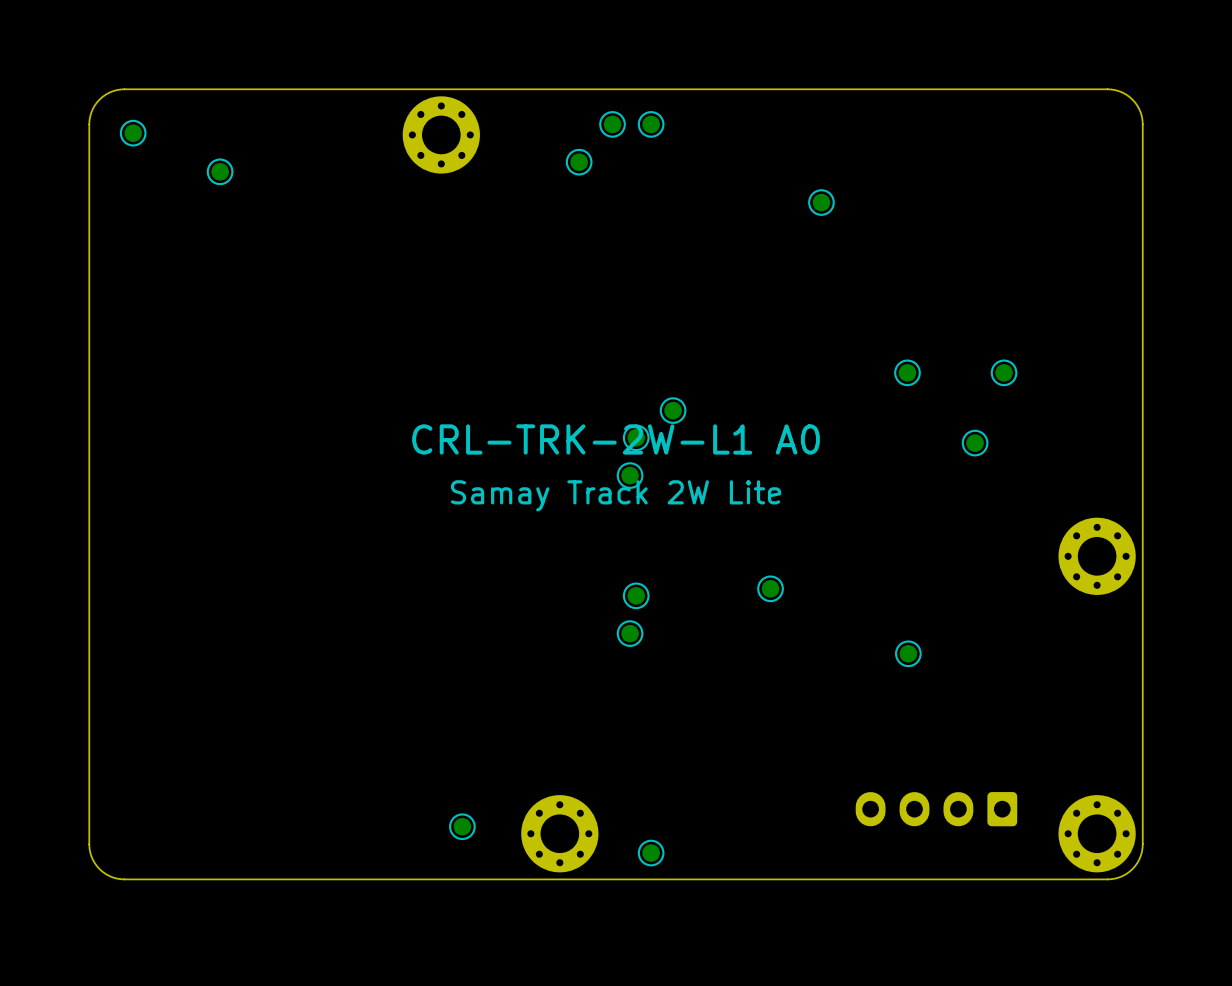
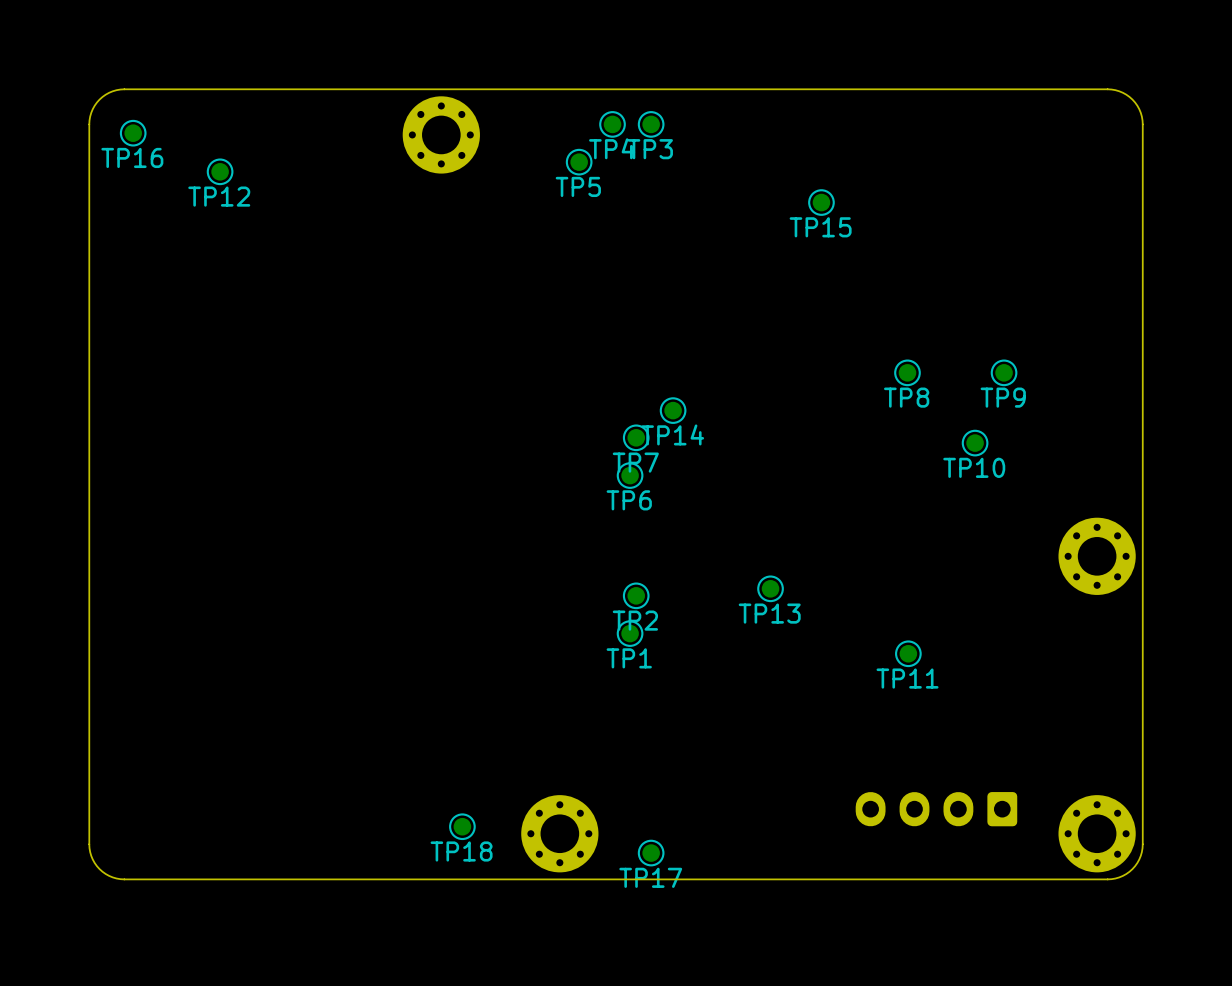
TP4 name: none -> TP4 (612, 148)
TP3 name: none -> TP3 (650, 149)
TP16 name: none -> TP16 (132, 157)
TP5 name: none -> TP5 (578, 186)
TP12 name: none -> TP12 (219, 196)
TP15 name: none -> TP15 (820, 227)
TP8 name: none -> TP8 (906, 397)
TP9 name: none -> TP9 (1003, 397)
TP14 name: none -> TP14 (672, 434)
text: CRL-TRK-2W-L1 A0 (616, 439) -> none
TP7 name: none -> TP7 (635, 462)
TP10 name: none -> TP10 (974, 467)
text: Samay Track 2W Lite (616, 495) -> none
TP6 name: none -> TP6 (629, 500)
TP13 name: none -> TP13 (769, 613)
TP2 name: none -> TP2 (635, 620)
TP1 name: none -> TP1 (629, 658)
TP11 name: none -> TP11 (907, 678)
TP18 name: none -> TP18 (461, 851)
TP17 name: none -> TP17 (650, 877)

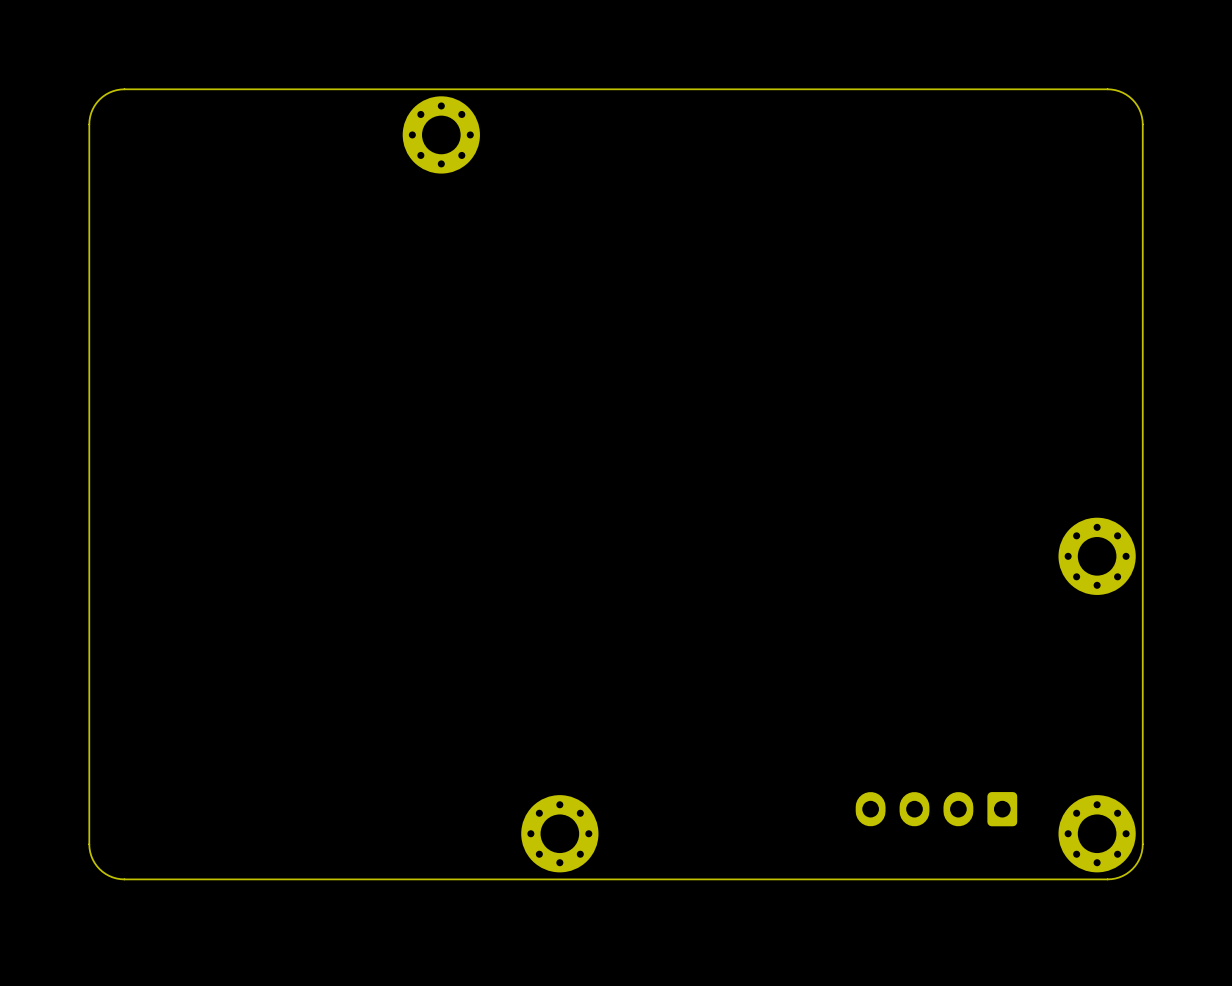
TP4: (612, 124) -> none
TP3: (651, 124) -> none
TP16: (133, 133) -> none
TP5: (579, 162) -> none
TP12: (220, 171) -> none
TP15: (821, 202) -> none
TP8: (907, 372) -> none
TP9: (1004, 372) -> none
TP14: (673, 410) -> none
TP7: (636, 437) -> none
TP10: (975, 443) -> none
TP6: (630, 475) -> none
TP13: (770, 588) -> none
TP2: (636, 595) -> none
TP1: (630, 633) -> none
TP11: (908, 653) -> none
TP18: (462, 826) -> none
TP17: (651, 853) -> none

